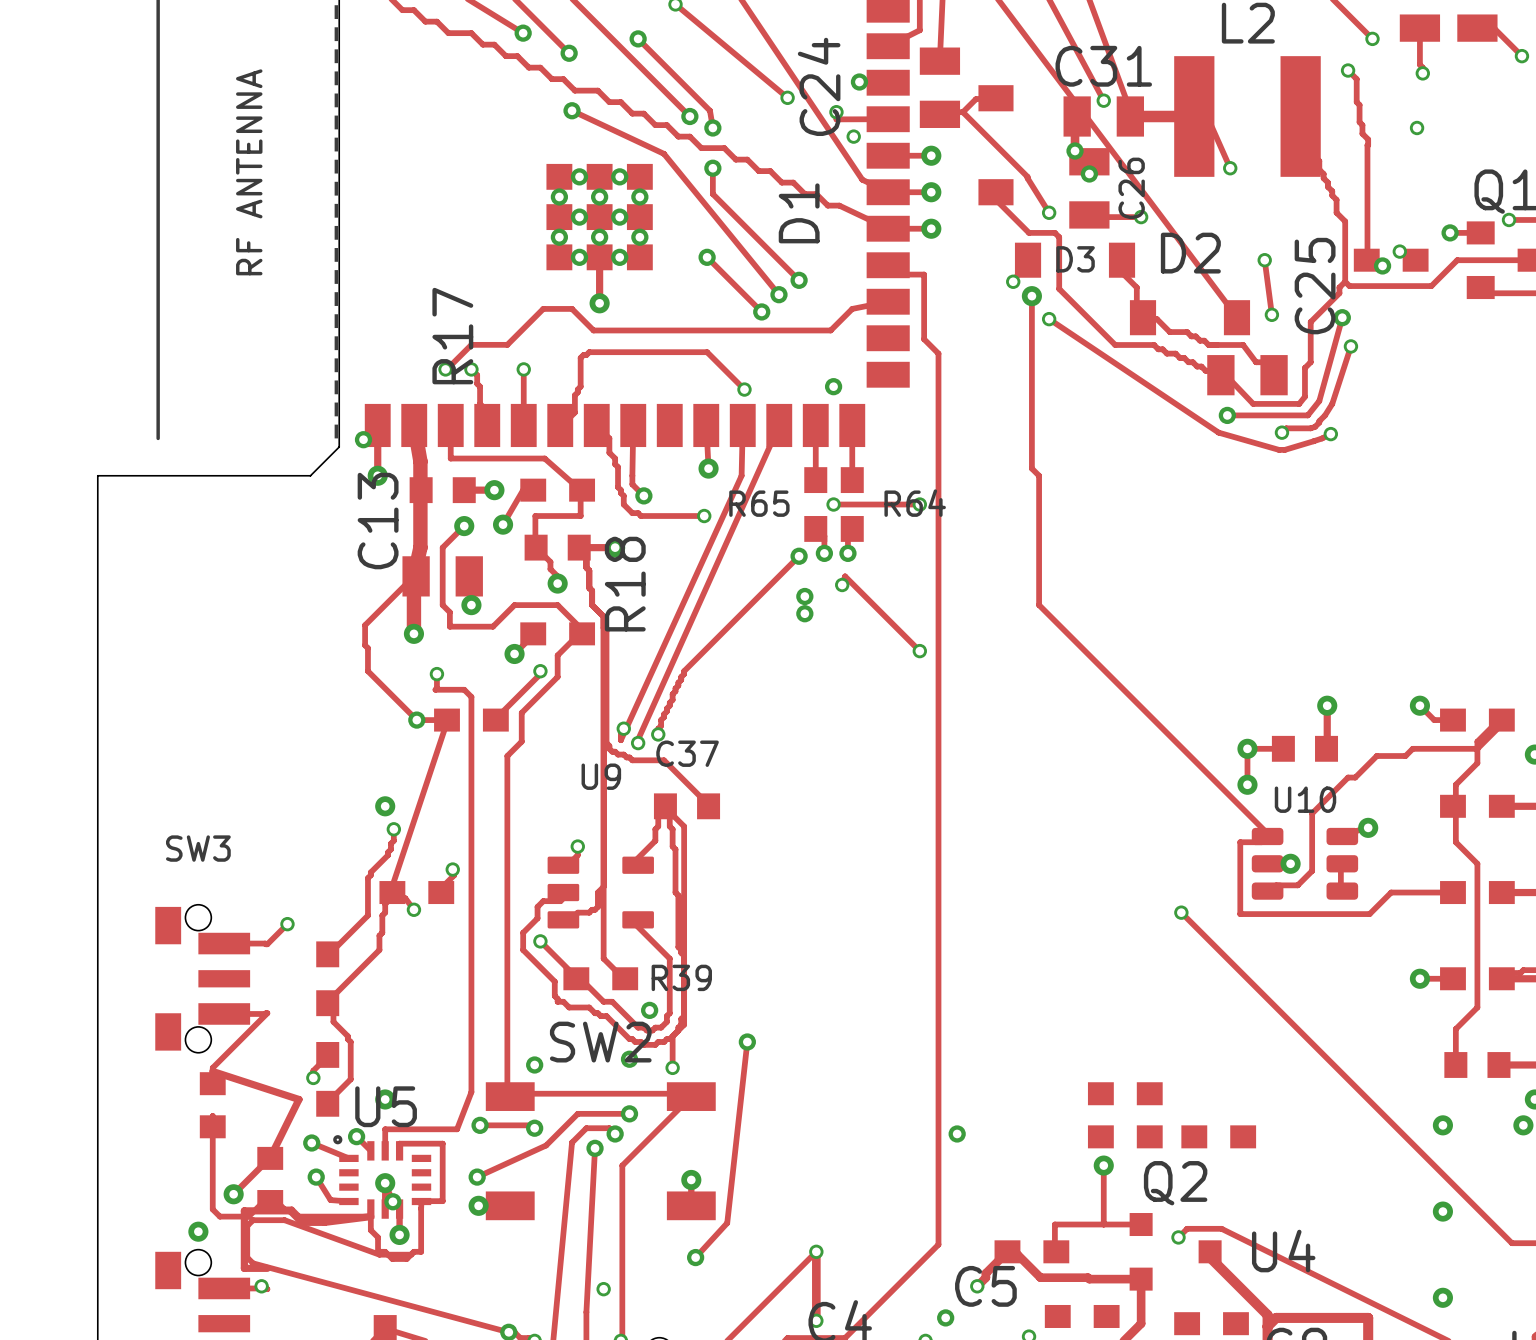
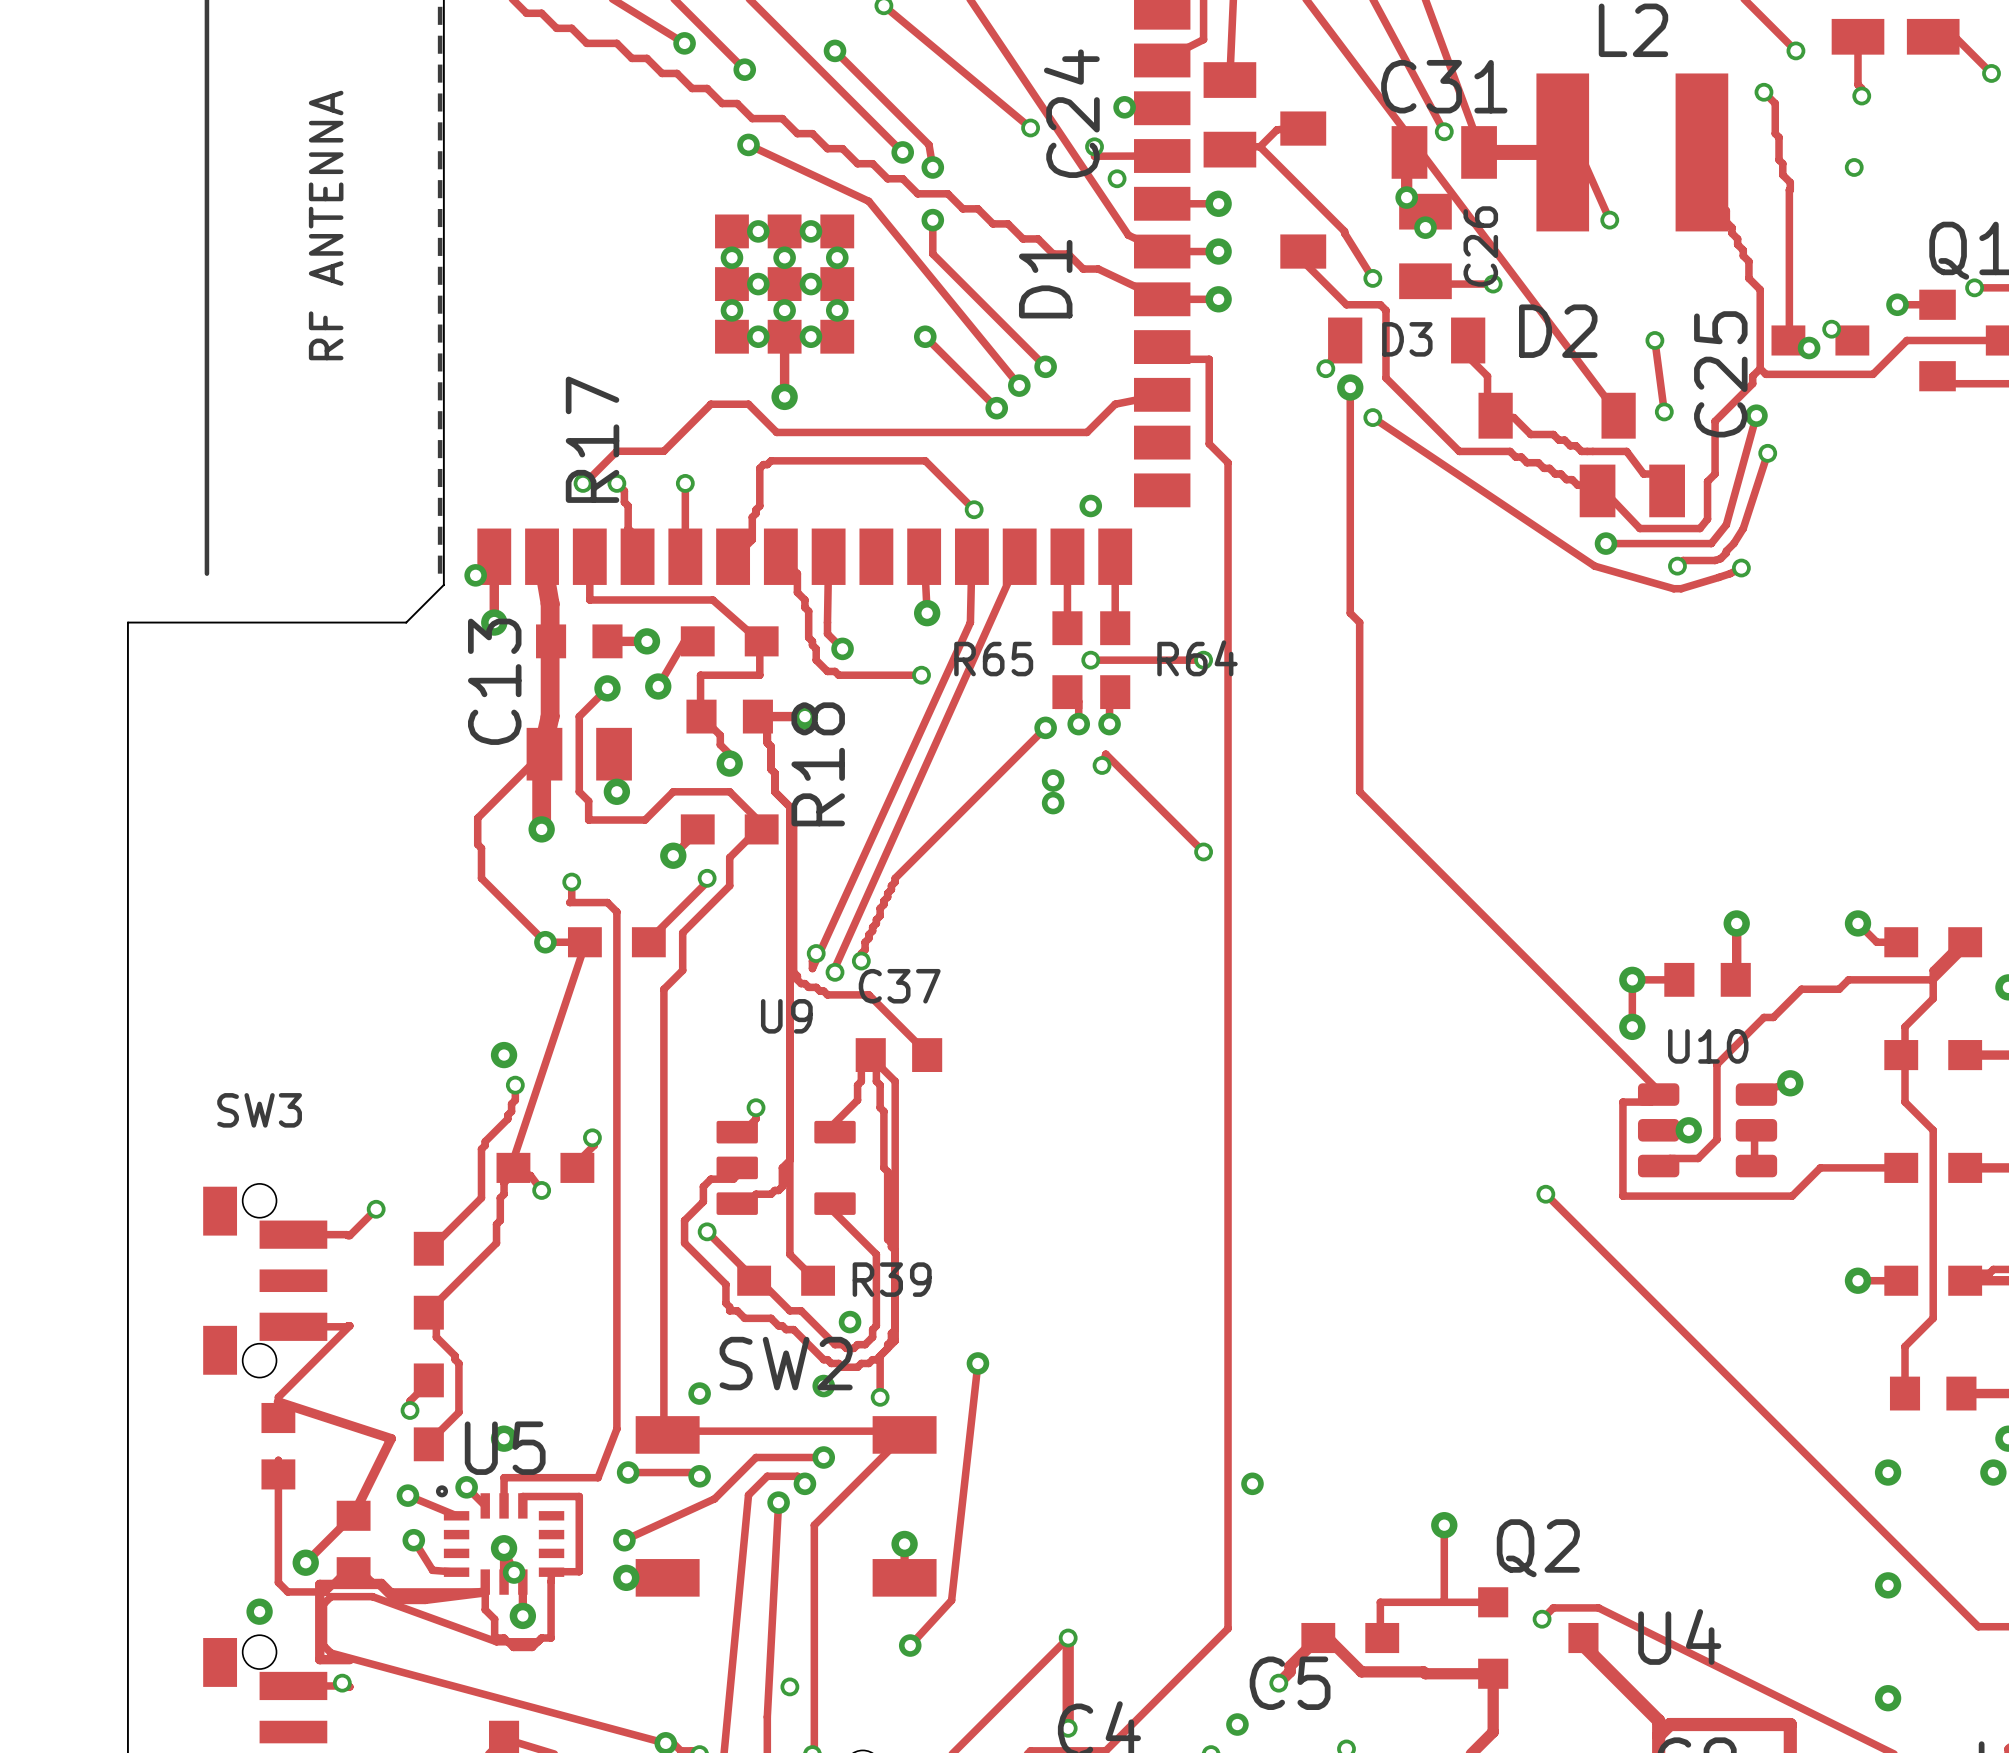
part: (1125, 1093) -> none
part: (1125, 1136) -> none
part: (1218, 1136) -> none
part: (1082, 1316) -> none
part: (1211, 1323) -> none

